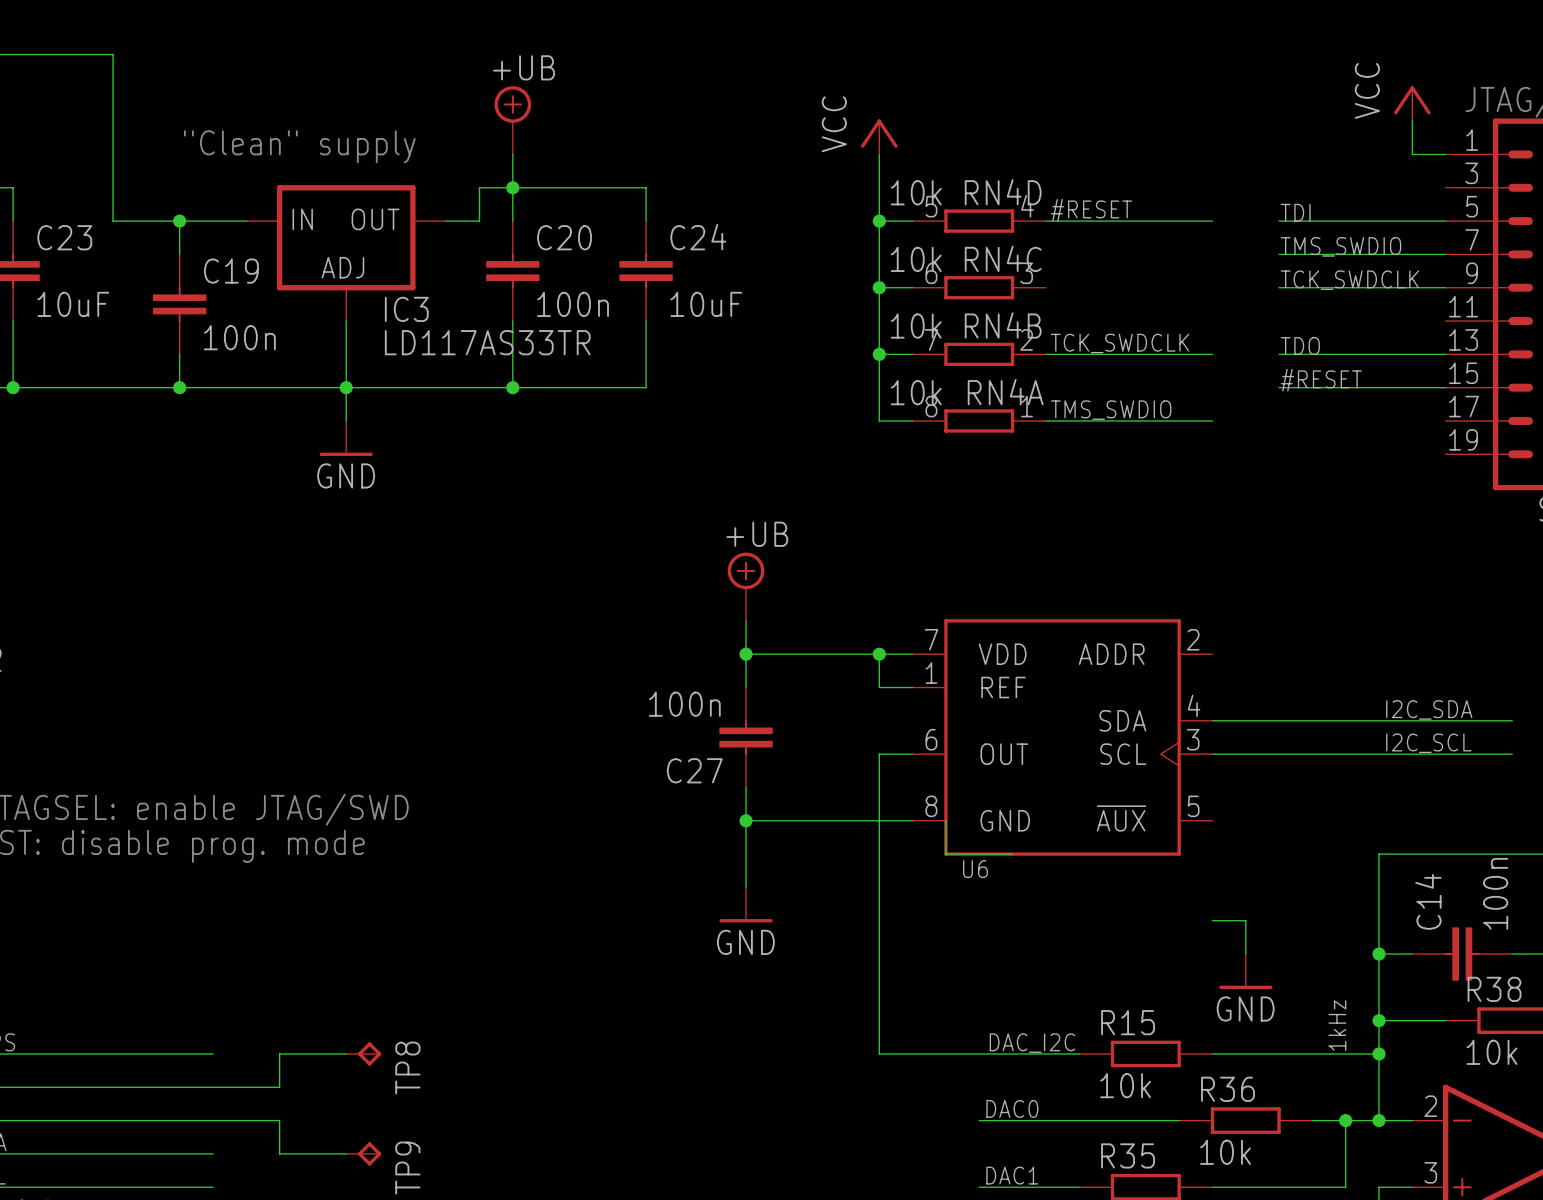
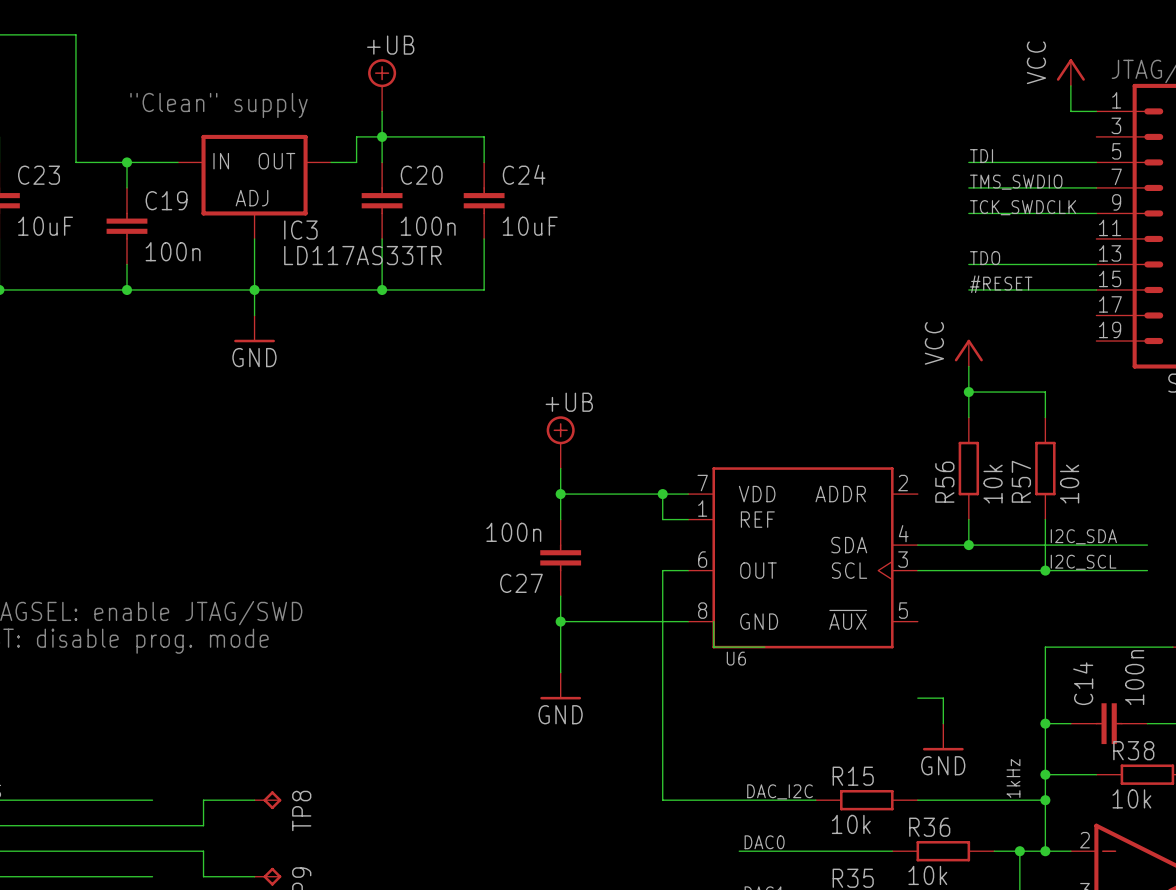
power symbol: VCC (879, 136) -> none
wire: (879, 154) (879, 420) (912, 420) -> none
label: #RESET (1091, 210) -> none
wire: (879, 221) (912, 221) -> none
junction: (879, 221) -> none
RN4D: 10k (979, 221) -> none
wire: (1045, 221) (1212, 221) -> none
wire: (879, 287) (912, 287) -> none
junction: (879, 287) -> none
RN4C: 10k (979, 287) -> none
label: TCK_SWDCLK (1120, 343) -> none
wire: (879, 354) (912, 354) -> none
junction: (879, 354) -> none
RN4B: 10k (979, 354) -> none
wire: (1045, 354) (1212, 354) -> none
label: TMS_SWDIO (1111, 410) -> none
RN4A: 10k (979, 420) -> none
wire: (1045, 420) (1212, 420) -> none
power symbol: none -> VCC (968, 353)
wire: none -> (968, 366) (968, 417)
wire: none -> (968, 392) (1045, 392) (1045, 417)
junction: none -> (968, 392)
R56: none -> 10k (968, 468)
R57: none -> 10k (1045, 468)
wire: none -> (968, 519) (968, 545)
wire: none -> (1045, 519) (1045, 570)
junction: none -> (968, 545)
junction: none -> (1045, 570)

